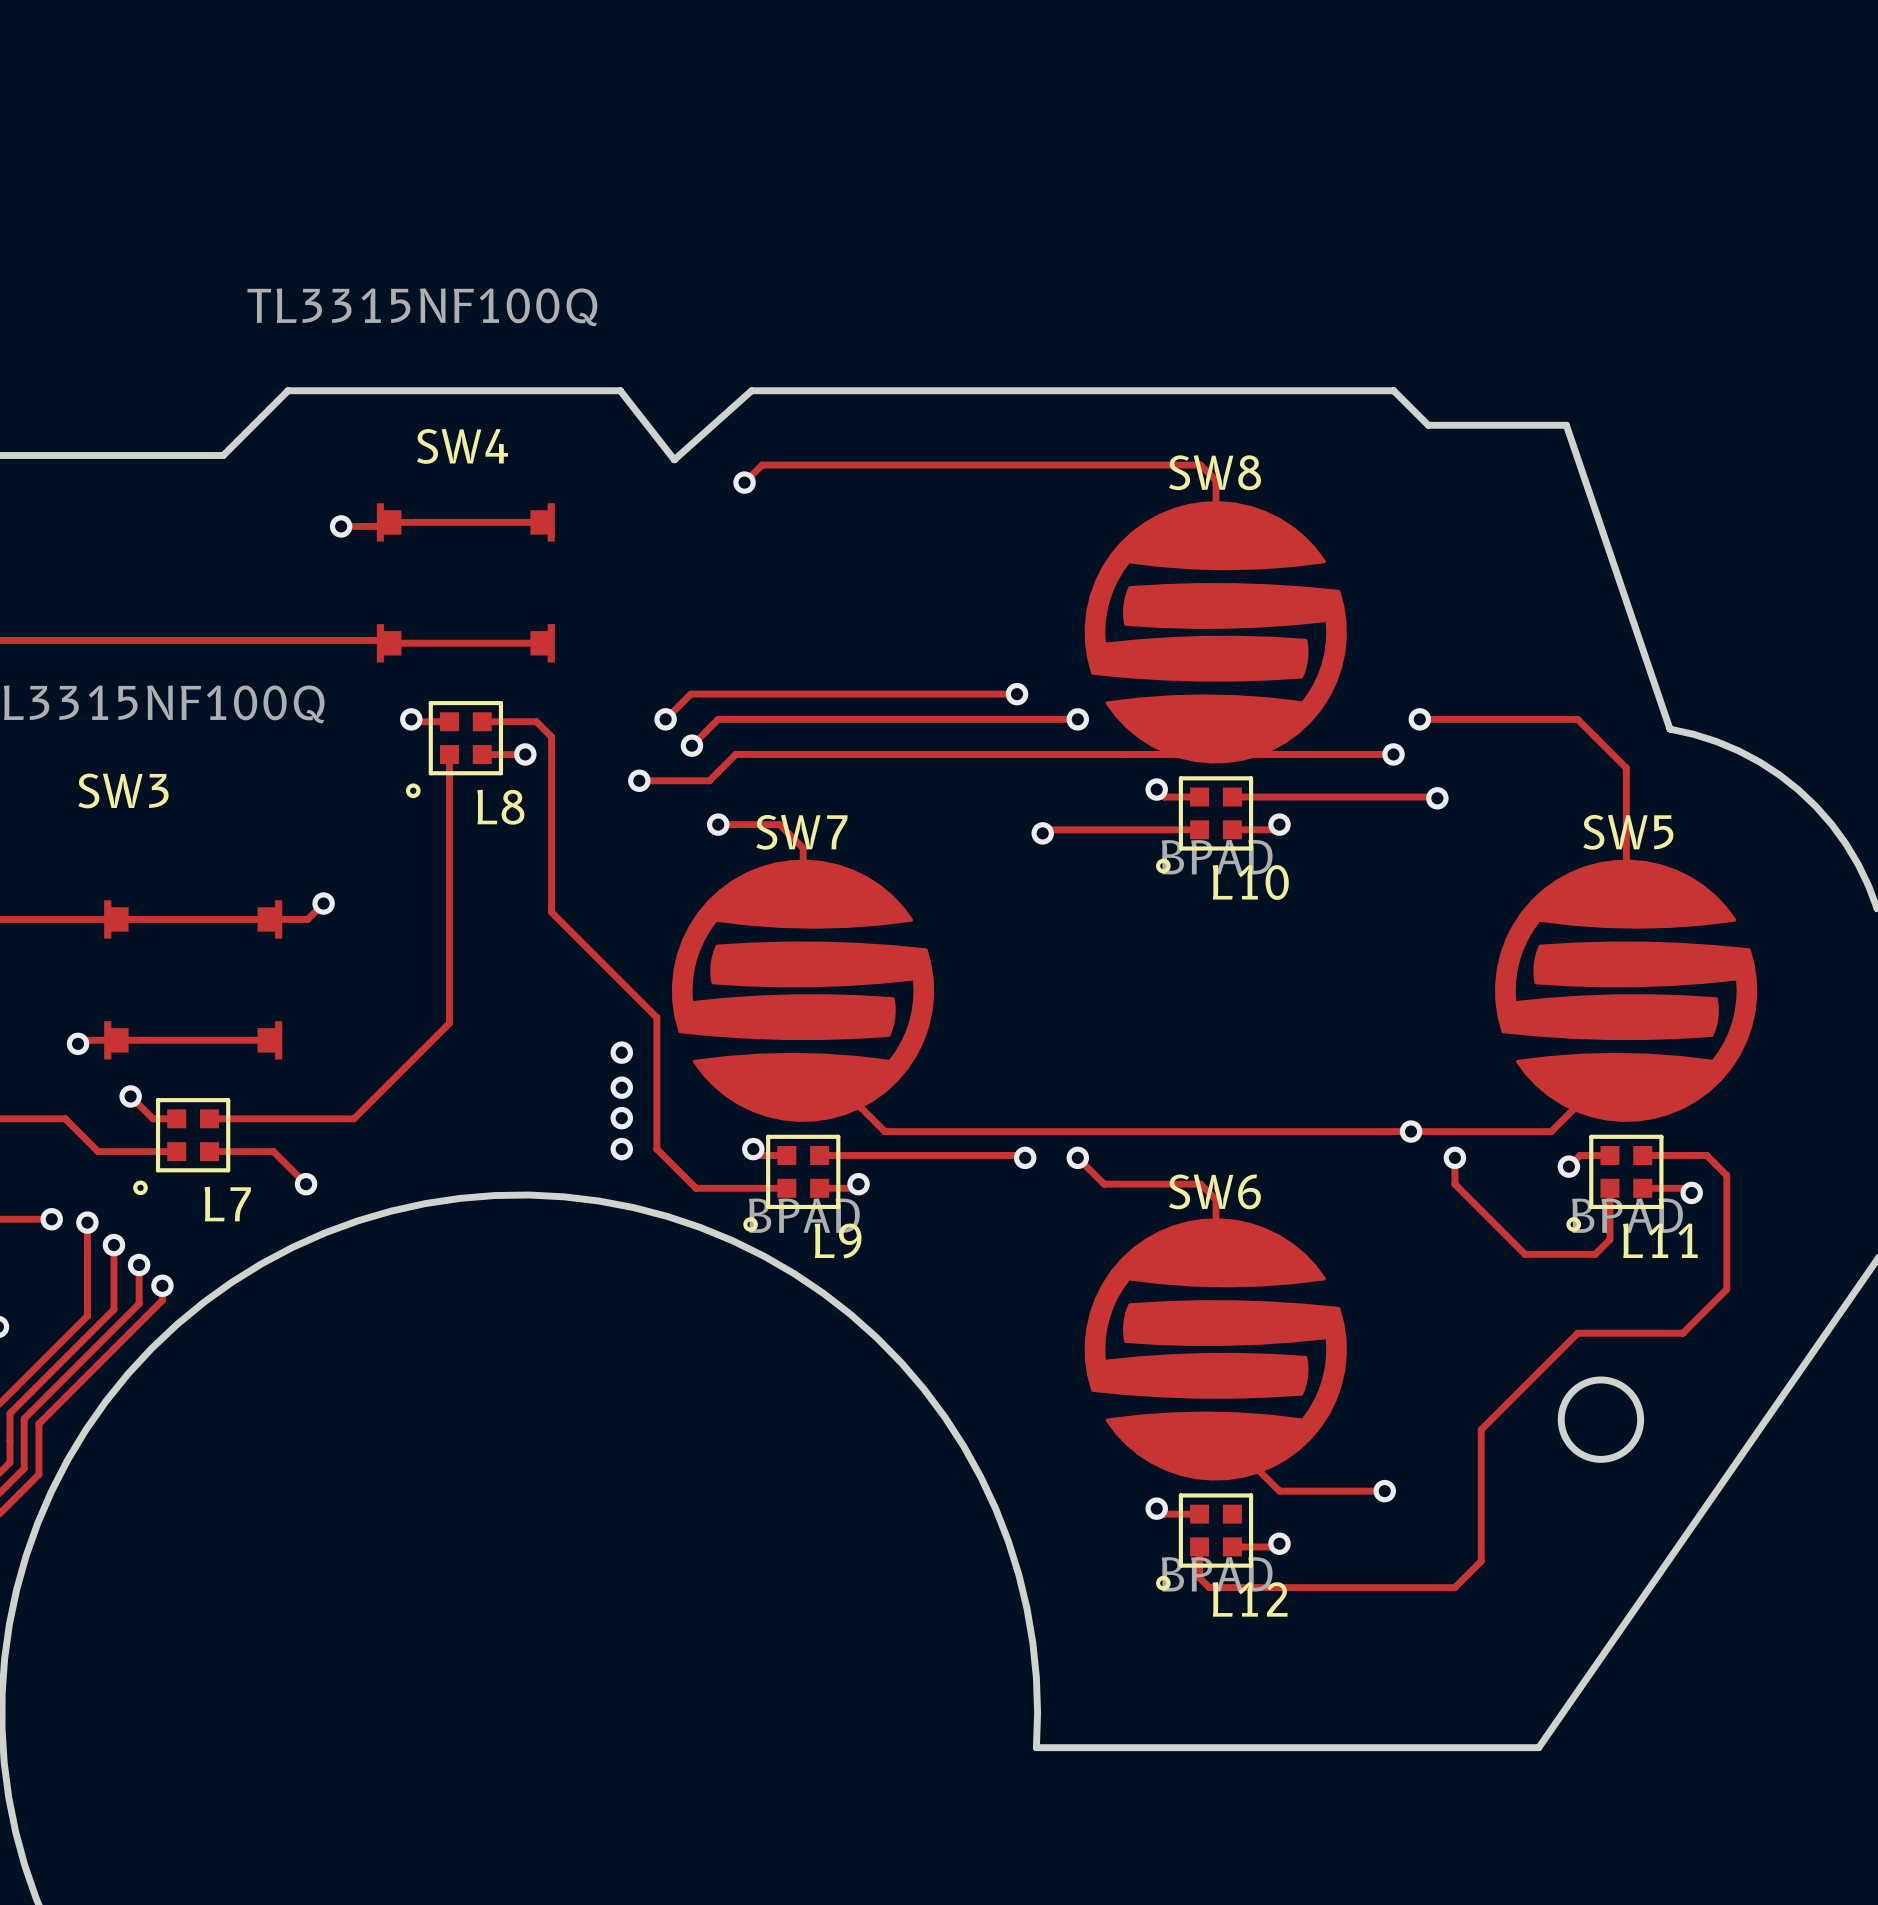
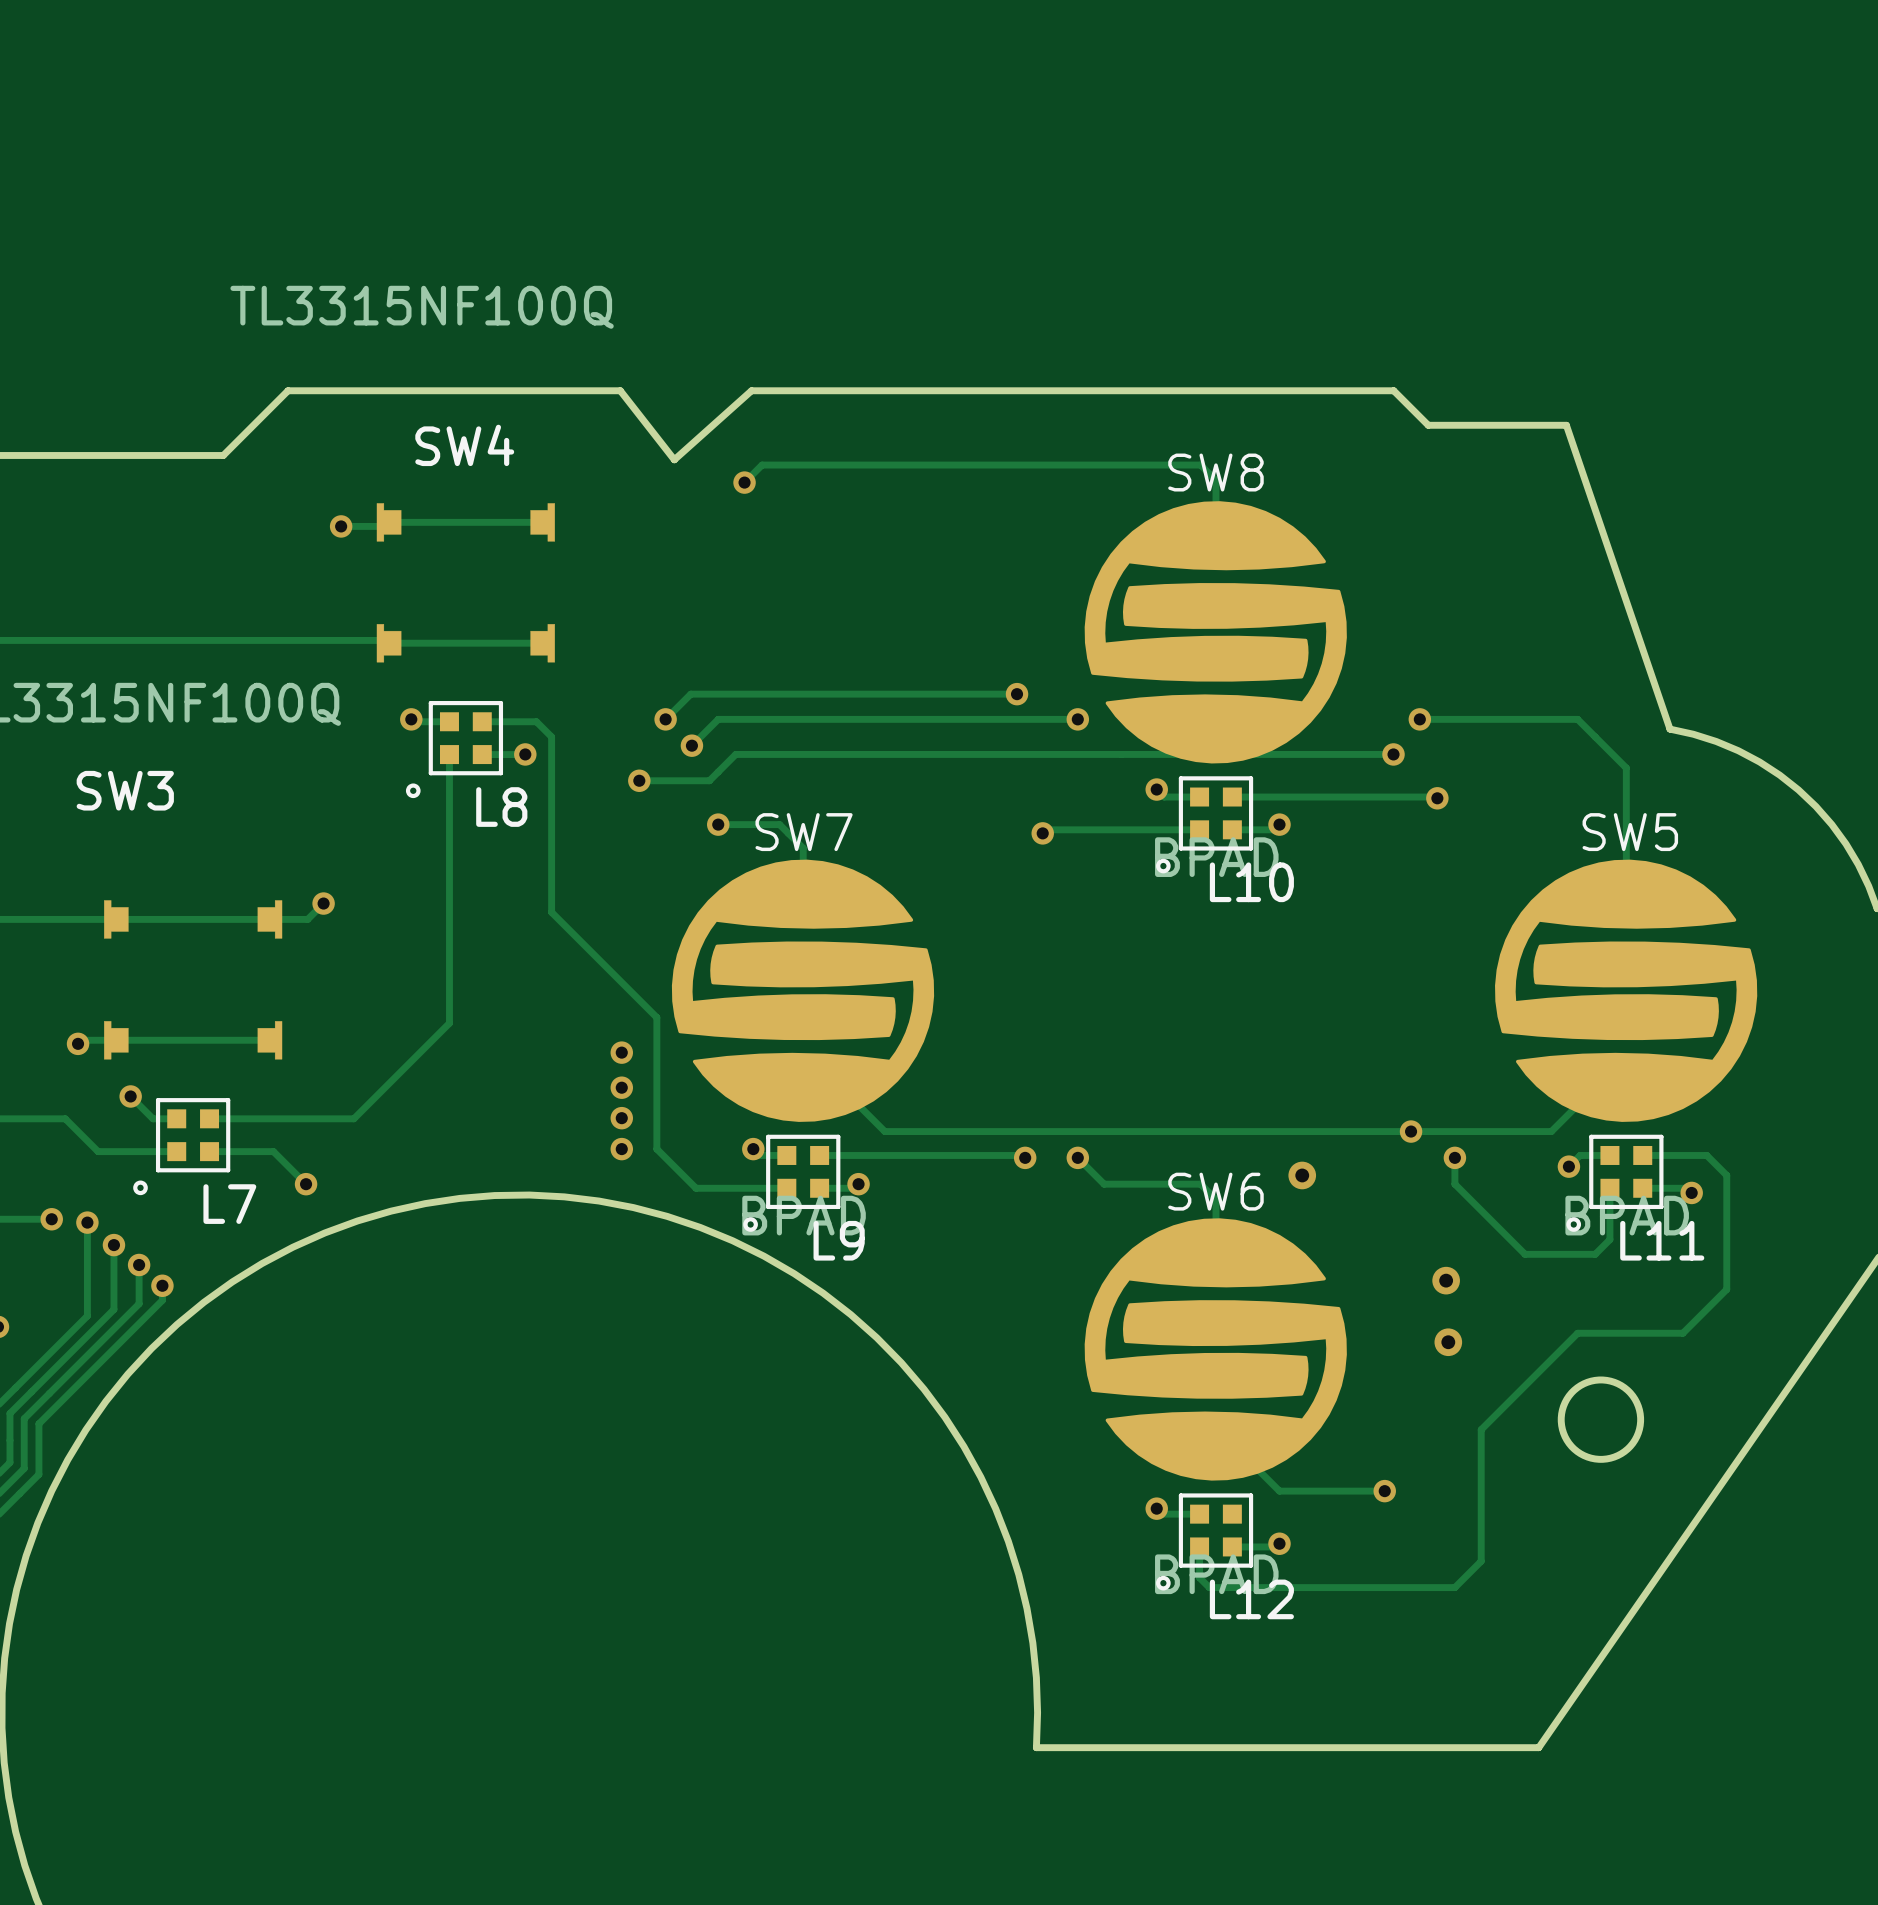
via: none -> (1302, 1175)
via: none -> (1446, 1280)
via: none -> (1448, 1342)

